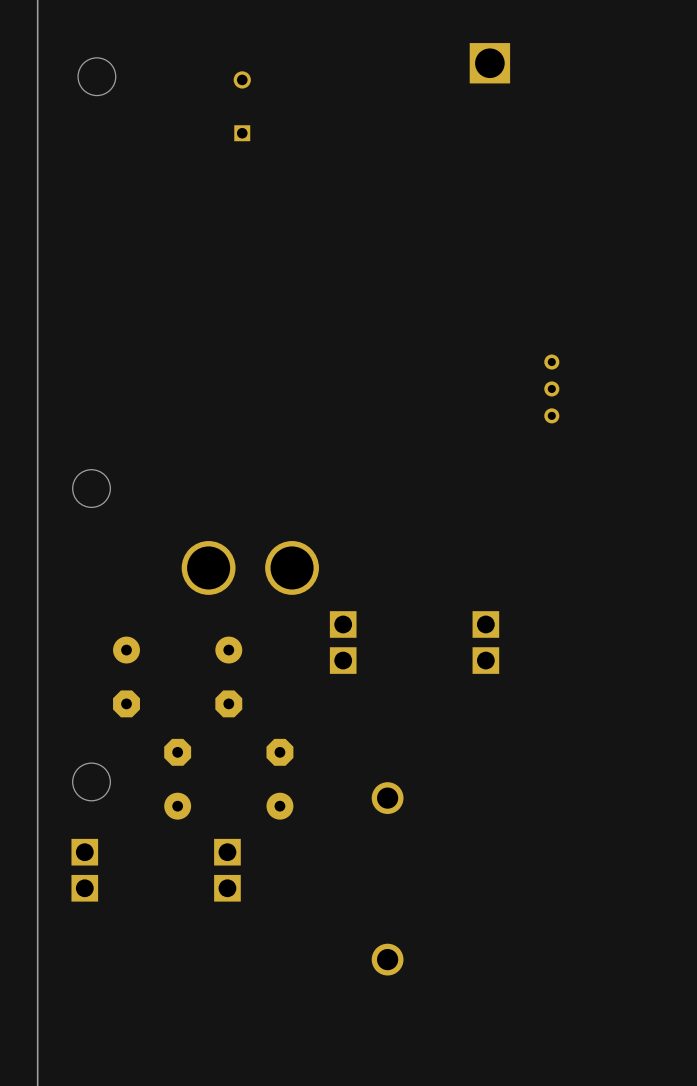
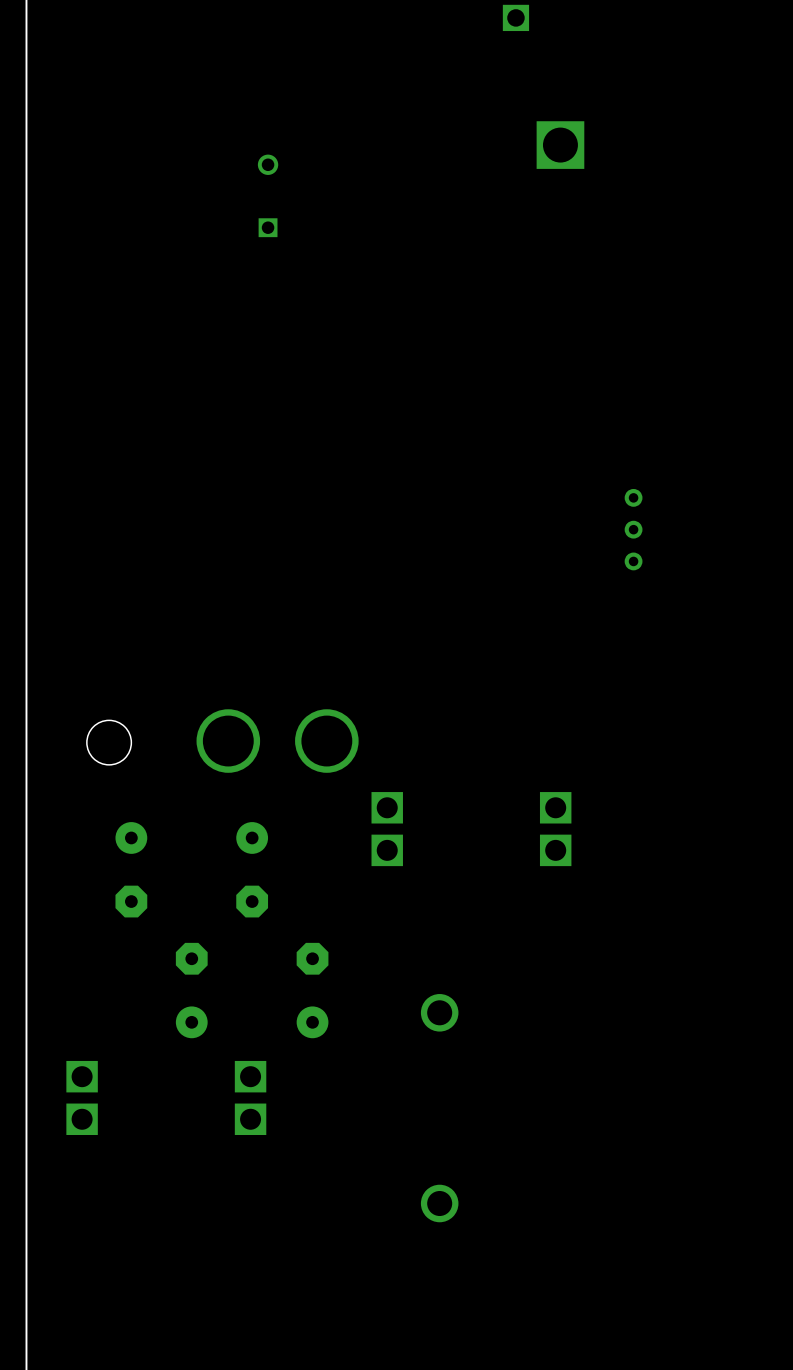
drawing: [77, 57, 116, 96] -> none
drawing position: (91, 488) -> (109, 742)
drawing: [72, 762, 111, 801] -> none

